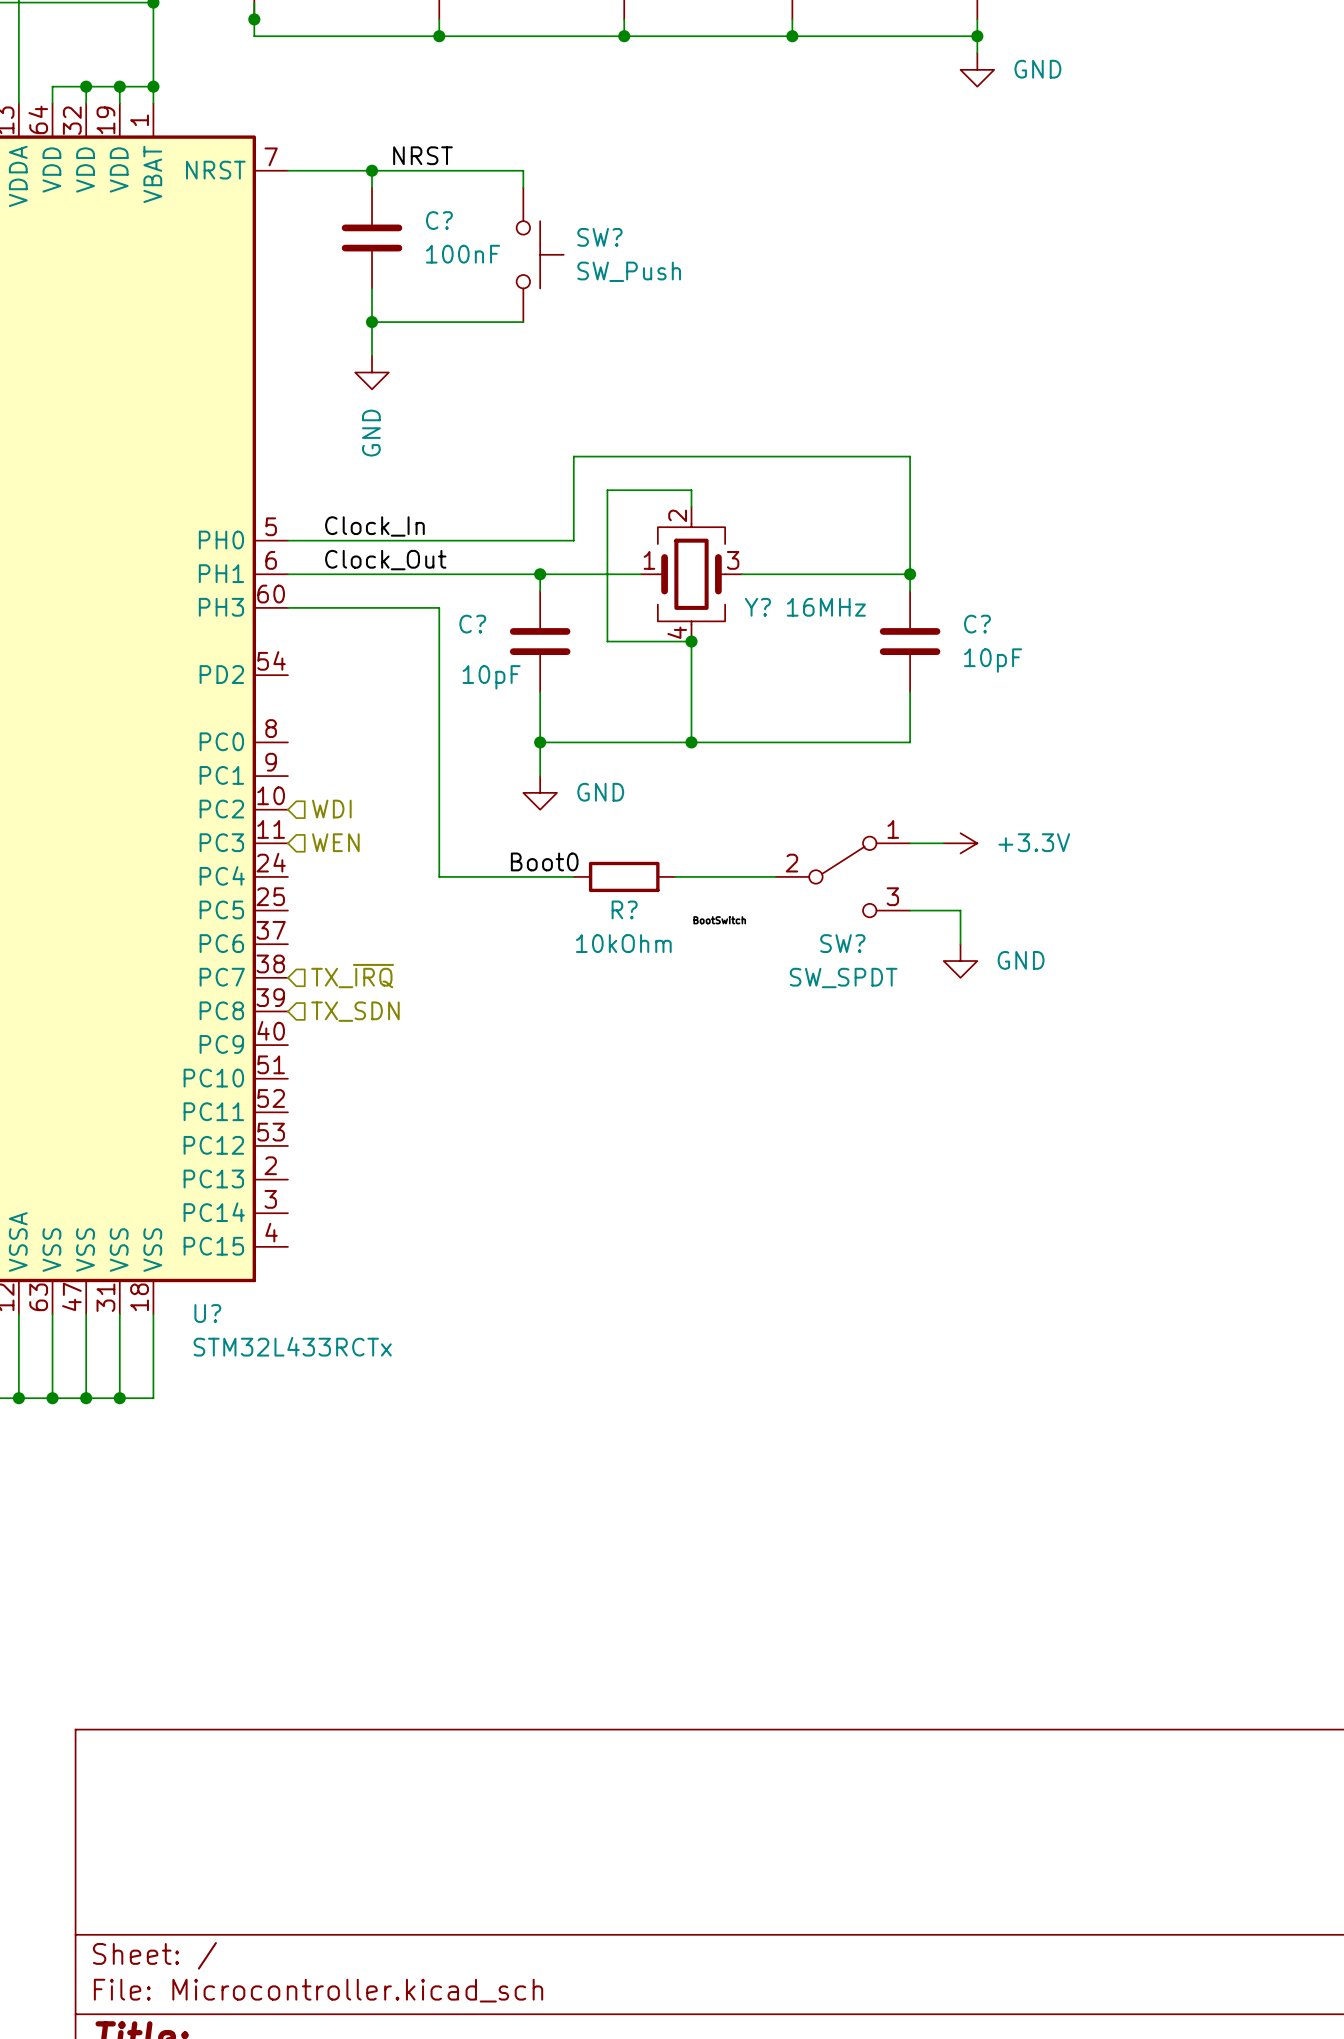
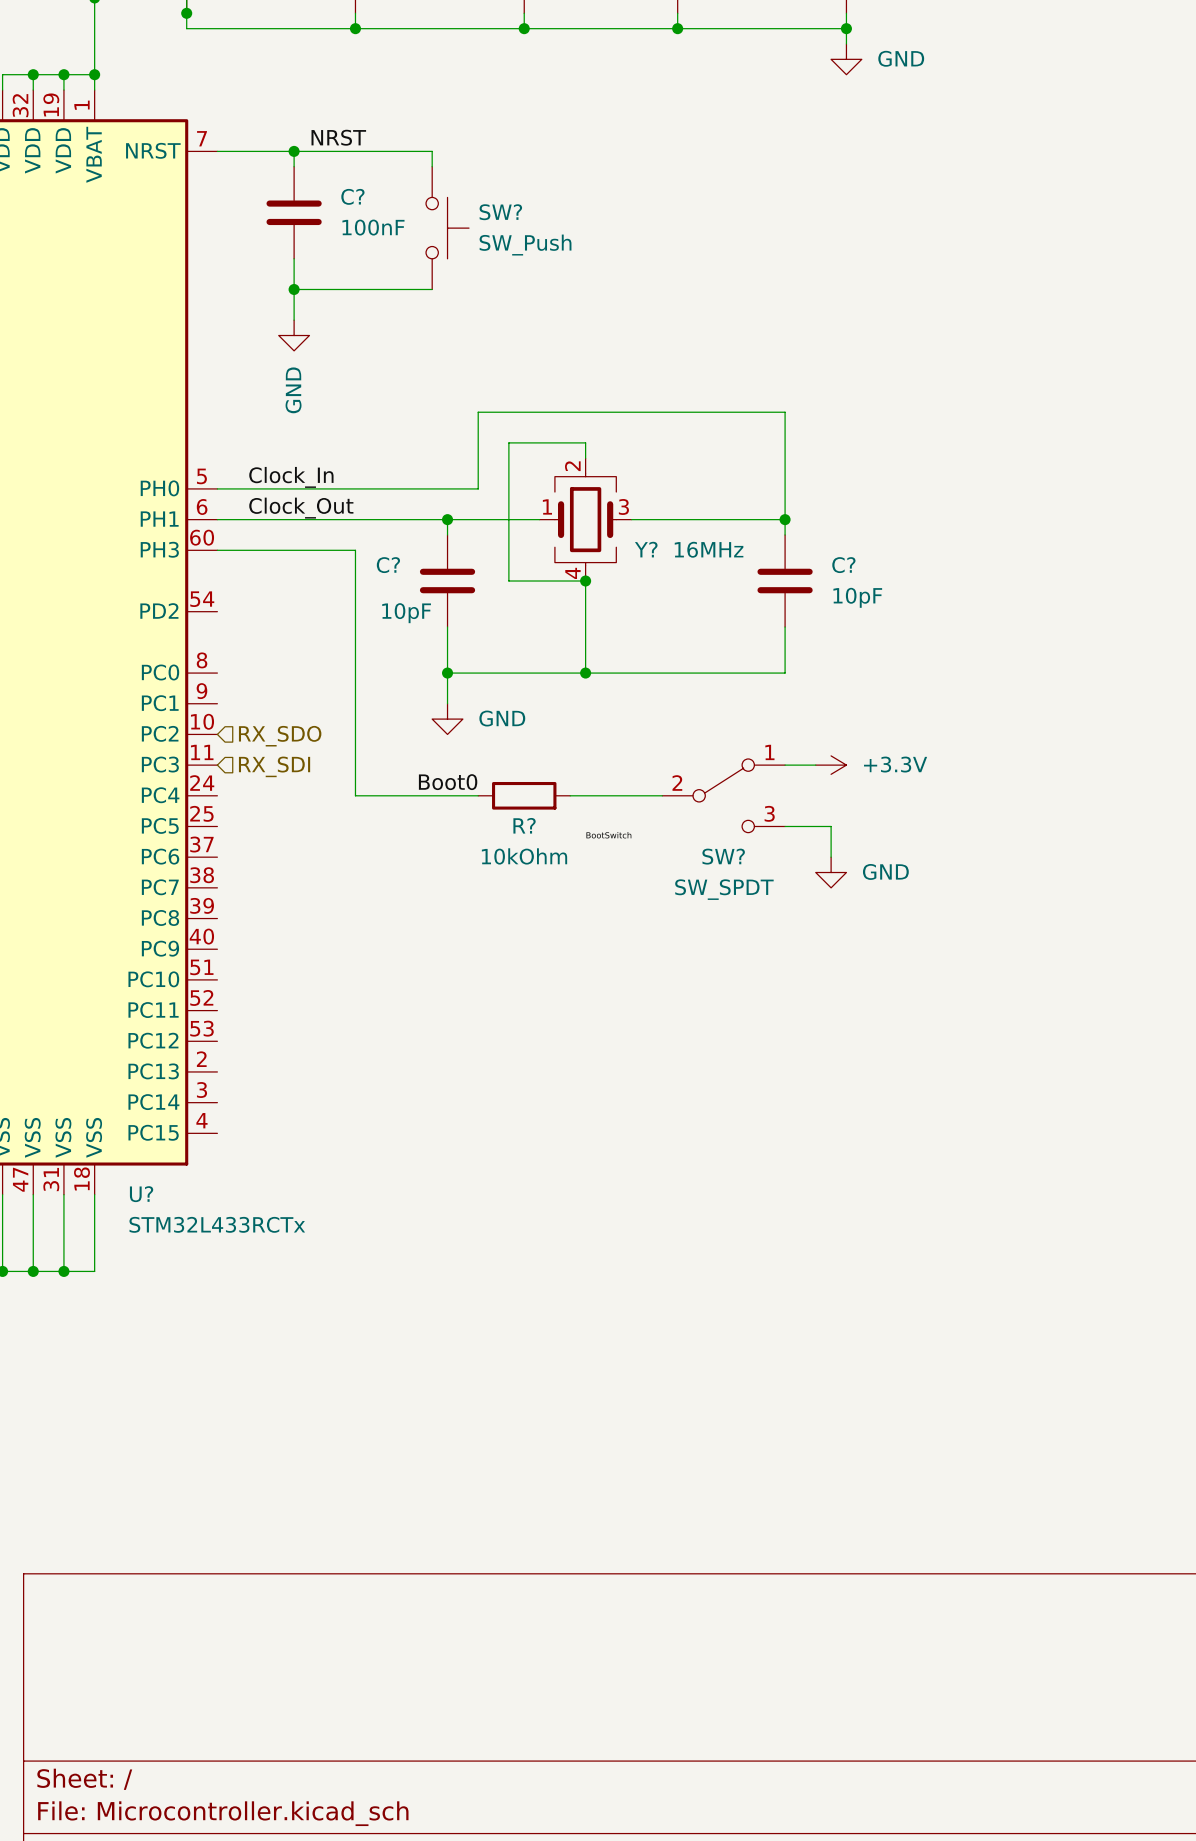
hierarchical label: WDI (331, 809) -> RX_SDO (280, 736)
hierarchical label: WEN (335, 842) -> RX_SDI (274, 766)
hierarchical label: TX_~{IRQ} (352, 976) -> none
hierarchical label: TX_SDN (355, 1011) -> none

